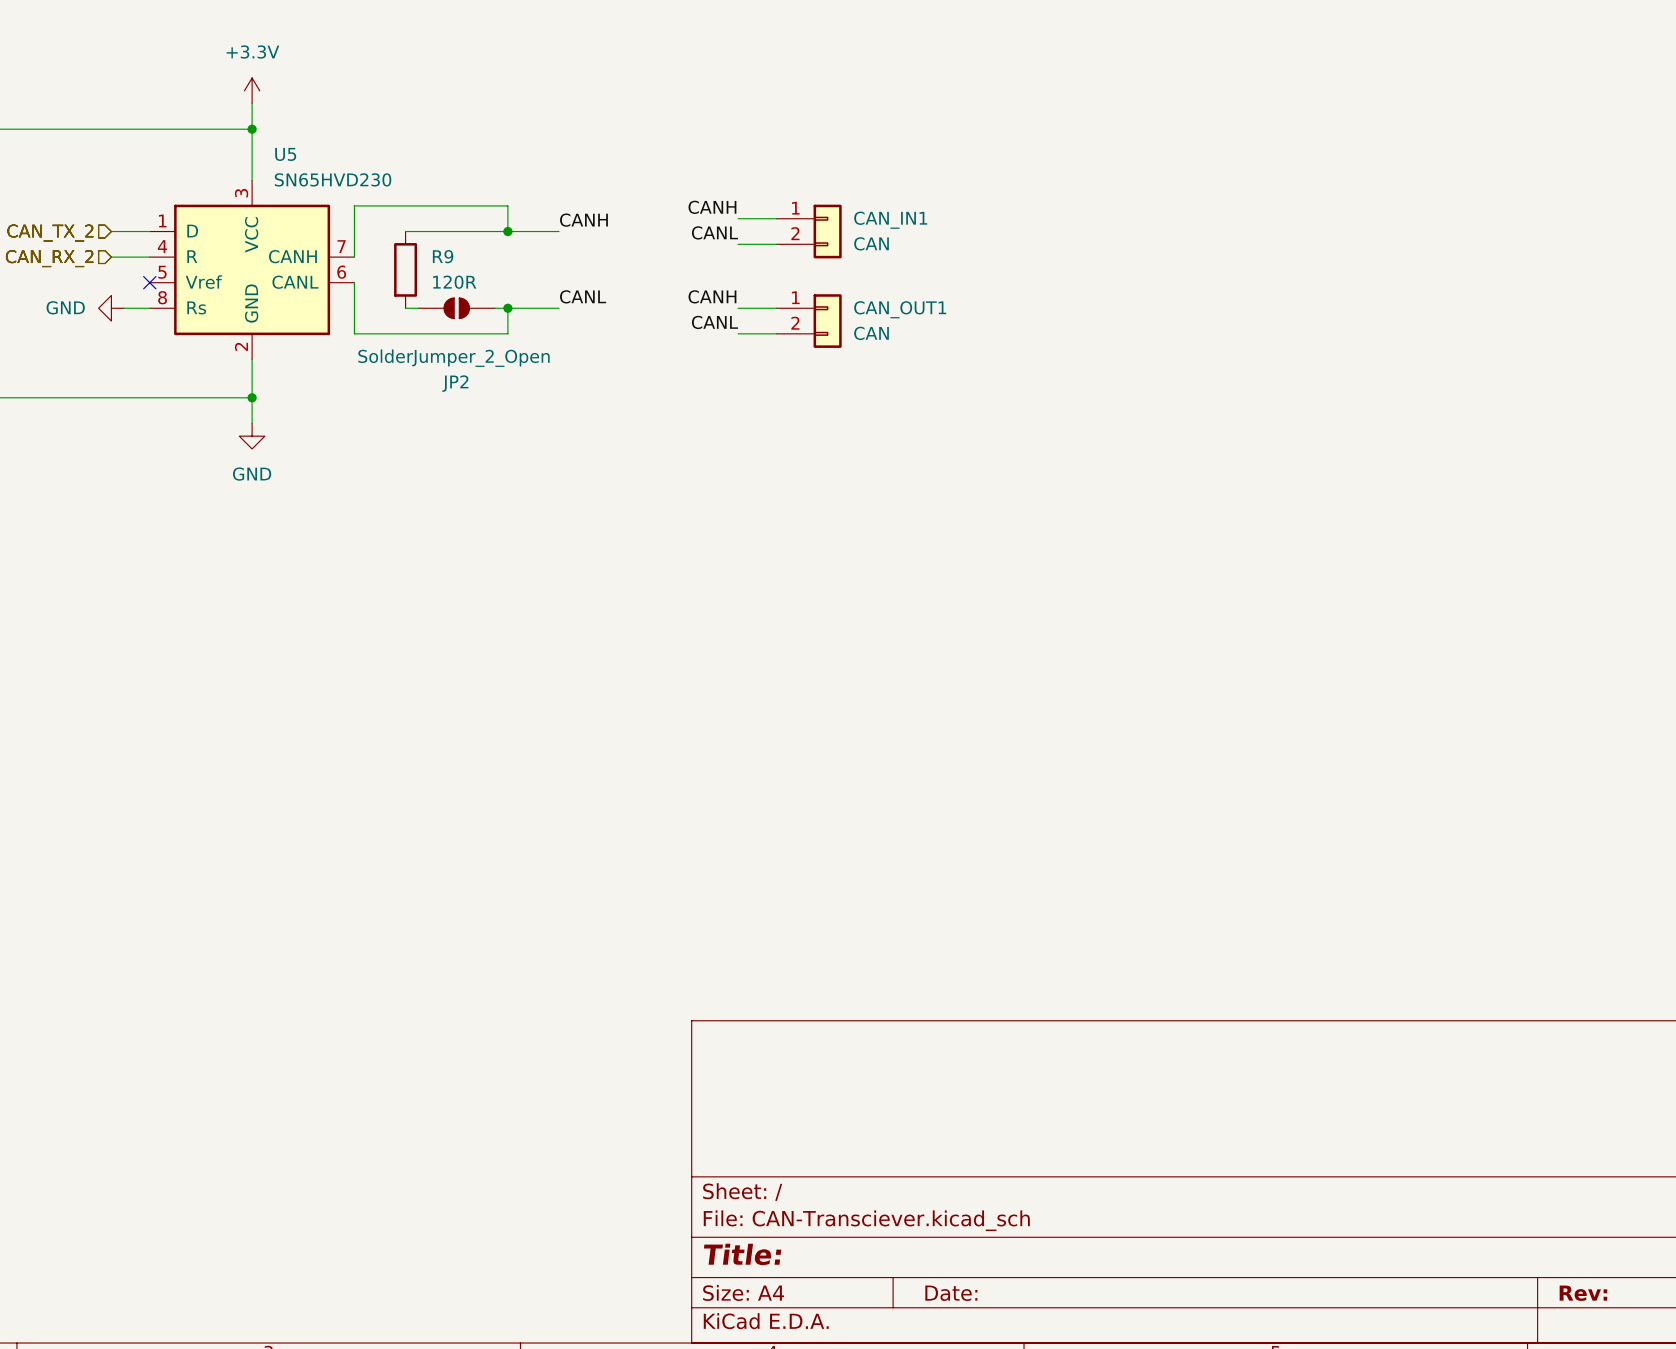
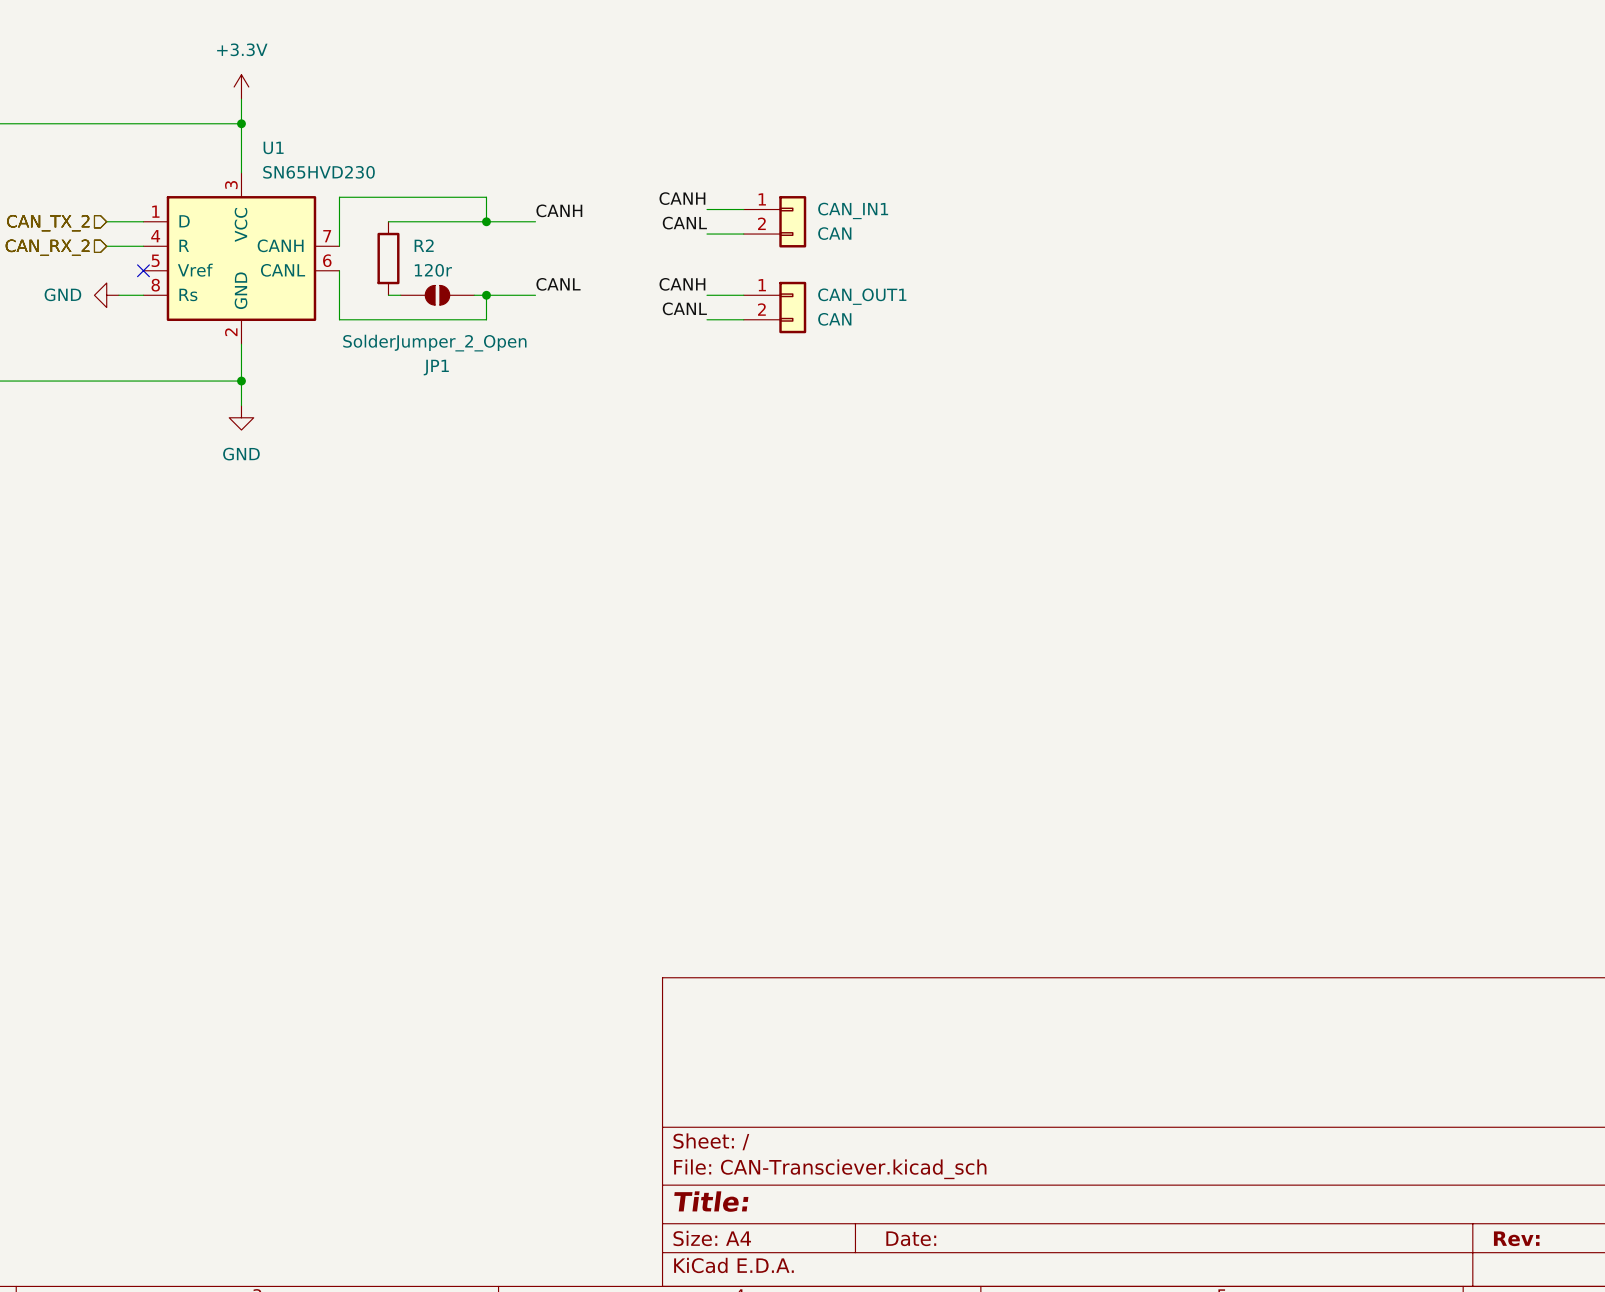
U5 name: U5 (285, 154) -> U1 (273, 147)
R9 name: R9 (443, 256) -> R2 (424, 245)
R9 value: 120R (454, 282) -> 120r (433, 270)
JP2 name: JP2 (455, 383) -> JP1 (436, 367)

